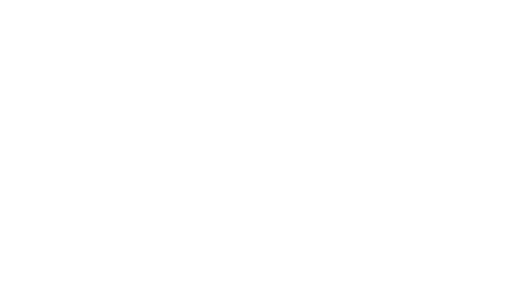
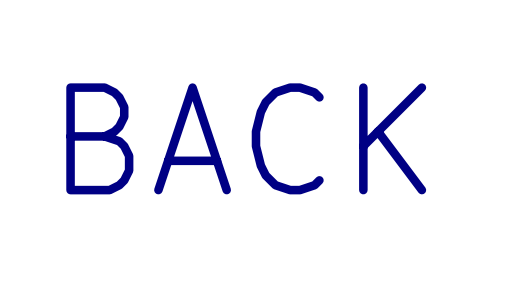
text: none -> BACK (246, 138)

